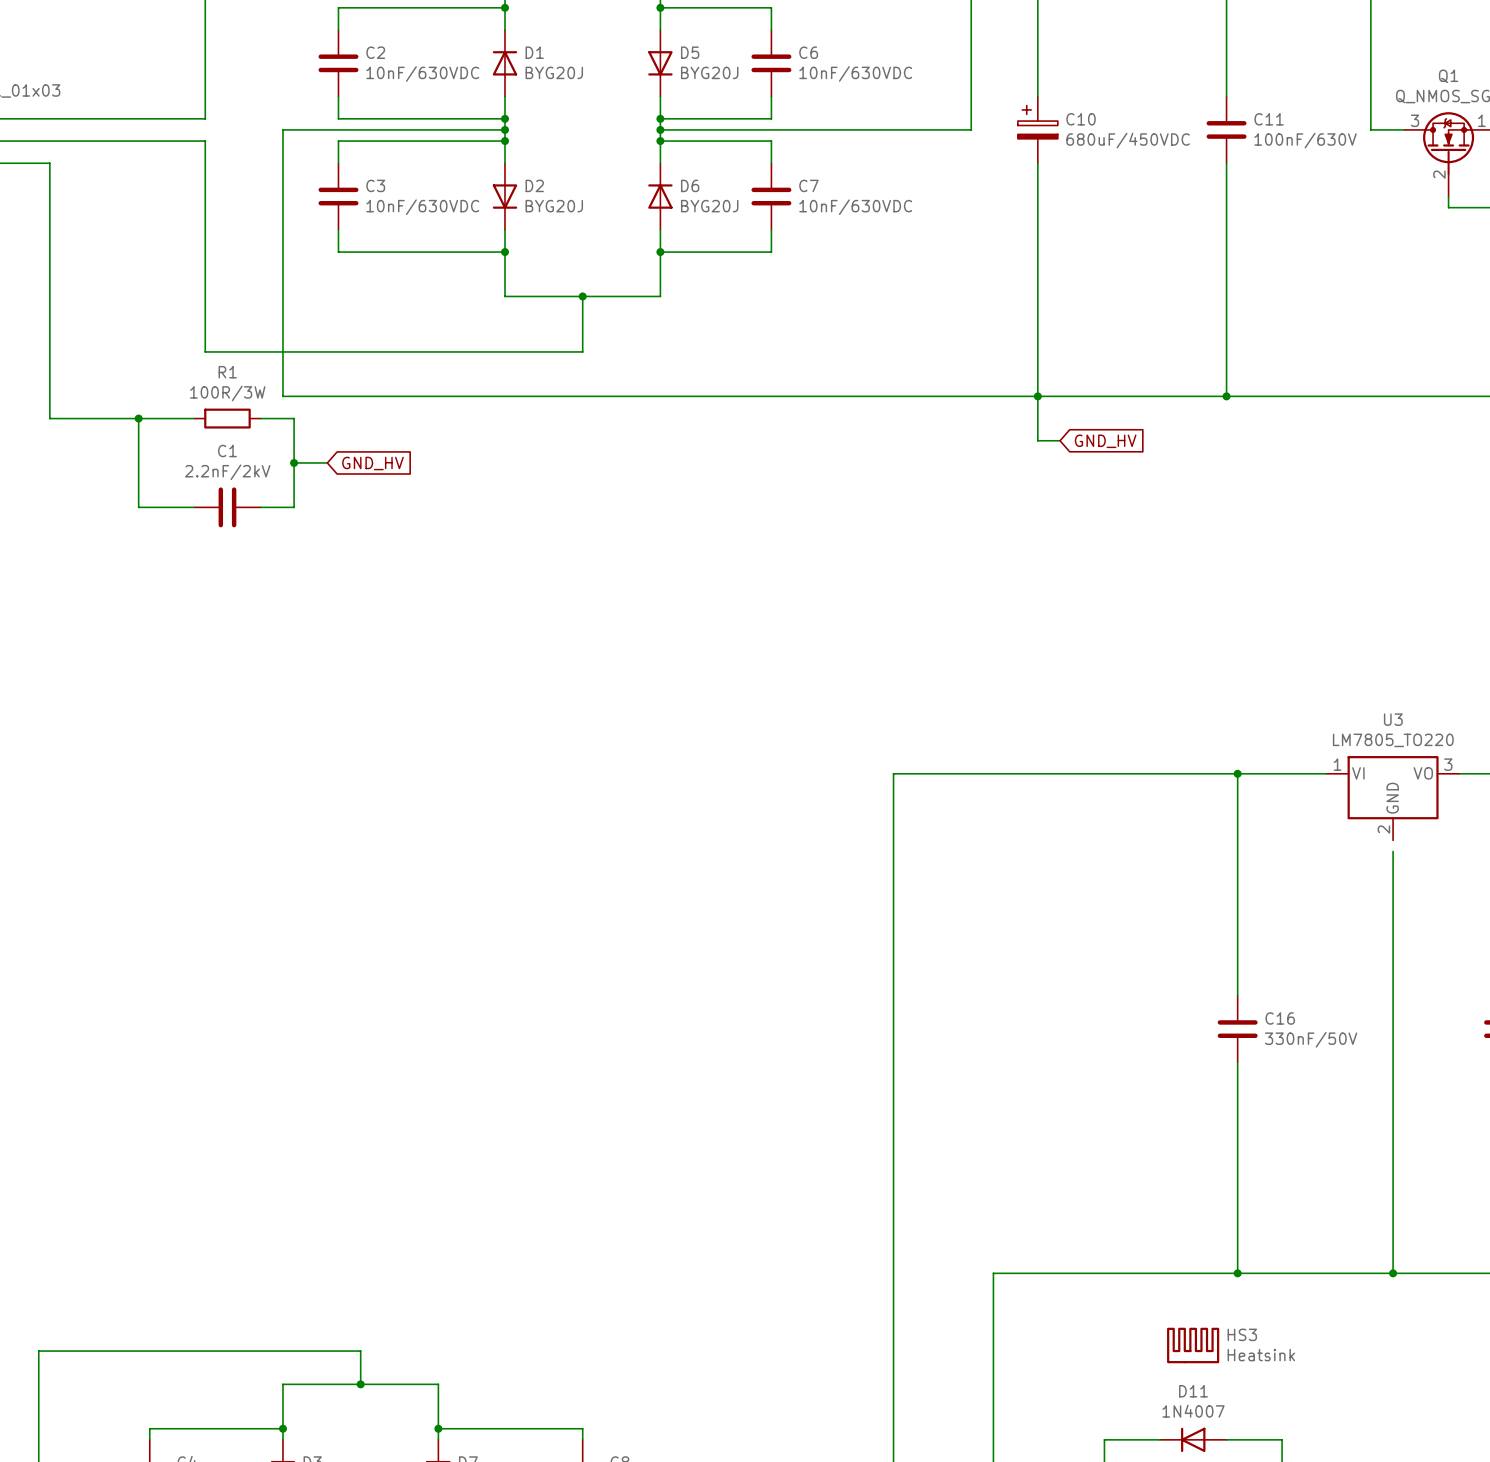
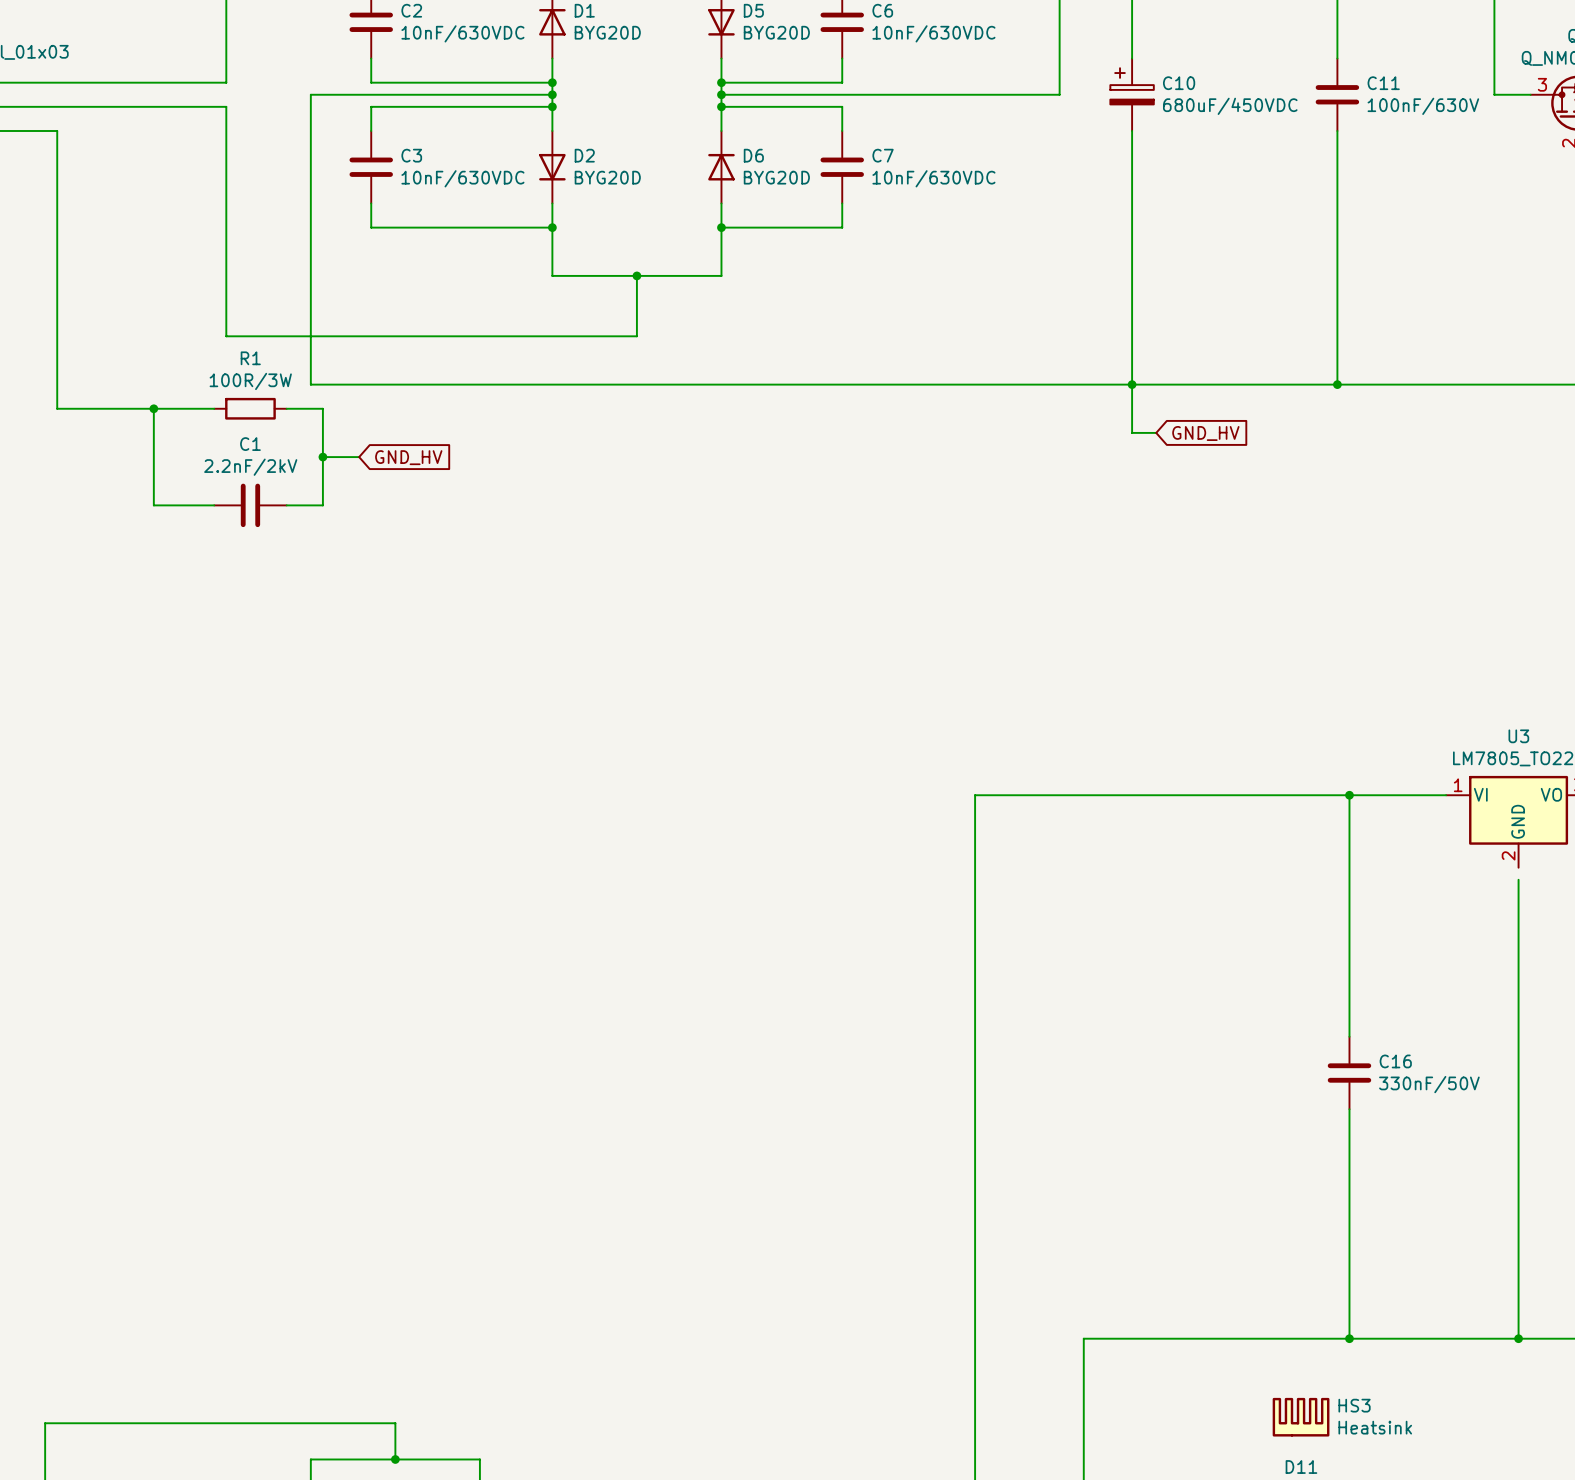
D1 value: BYG20J (554, 72) -> BYG20D (607, 32)
D5 value: BYG20J (709, 72) -> BYG20D (776, 32)
D2 value: BYG20J (554, 206) -> BYG20D (607, 177)
D6 value: BYG20J (709, 206) -> BYG20D (776, 177)

